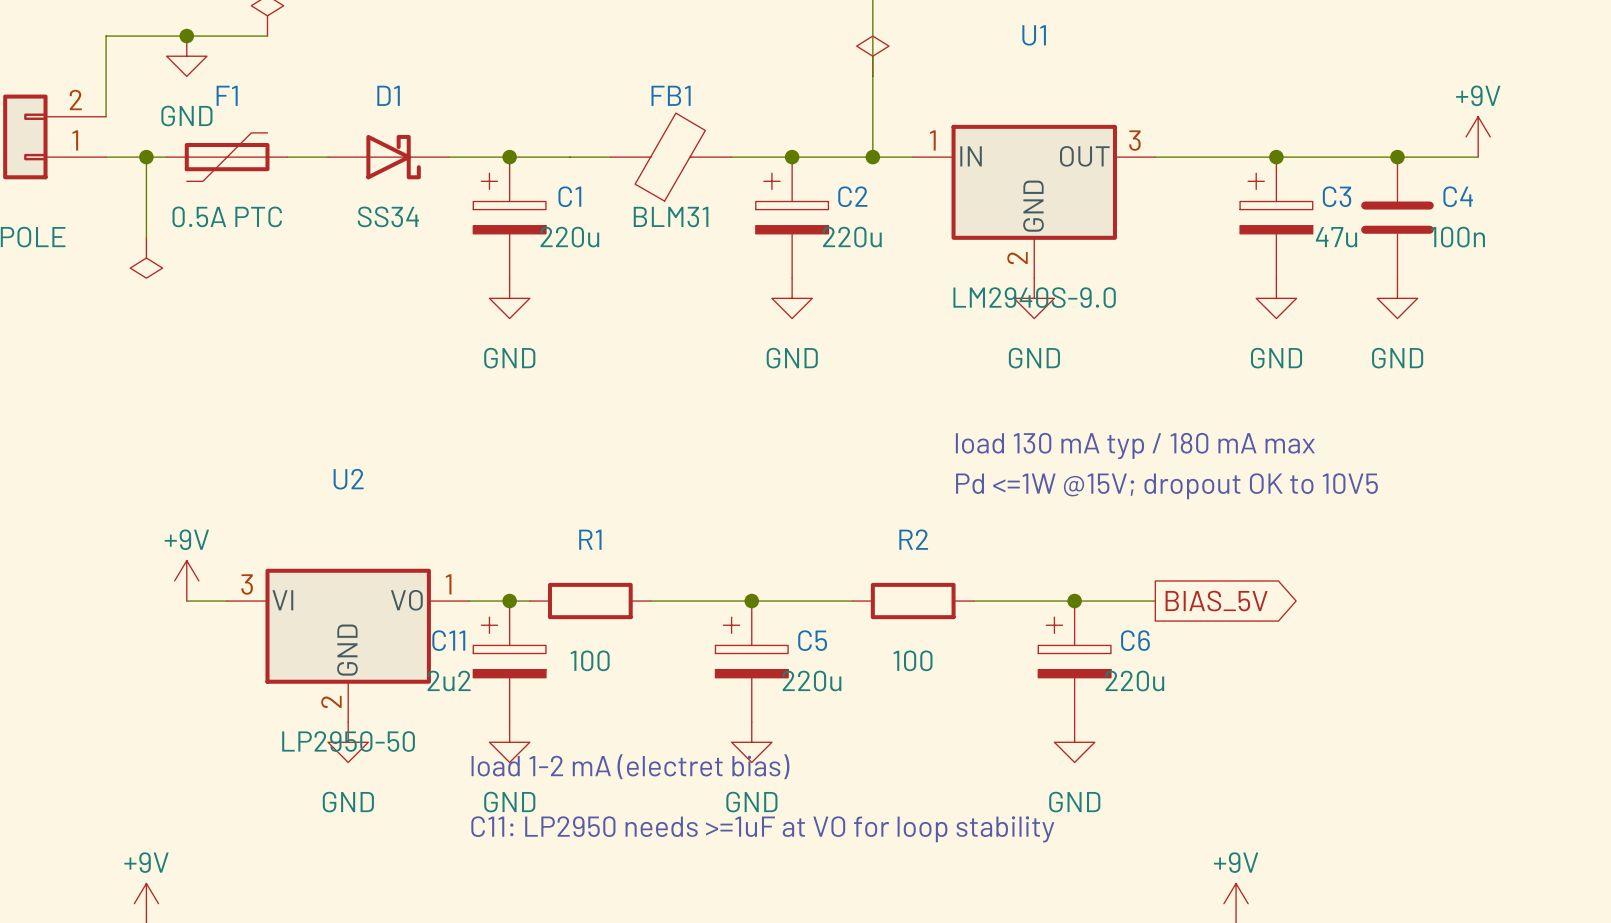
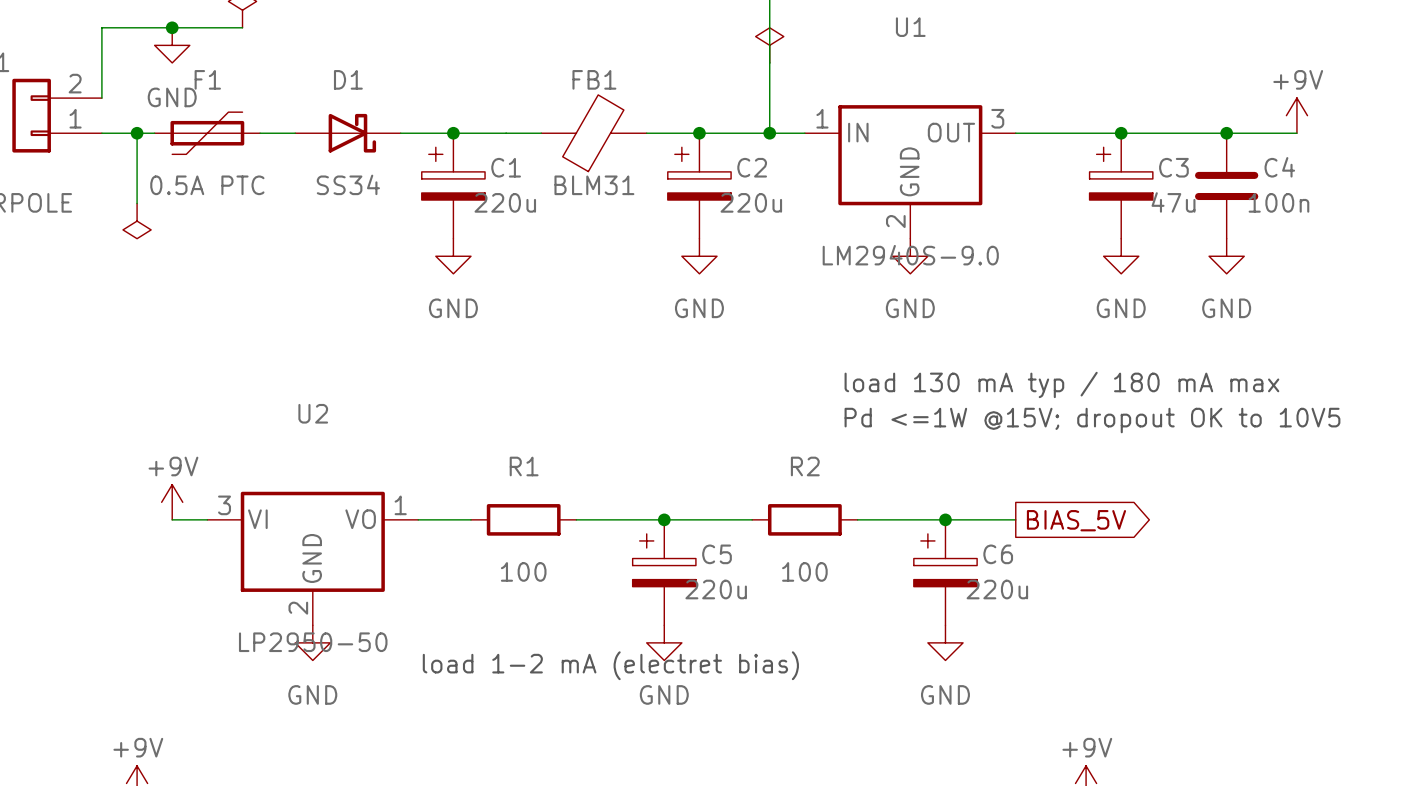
junction: (509, 601) -> none
C11: 2u2 (509, 661) -> none
power symbol: GND (509, 742) -> none
text: C11: LP2950 needs >=1uF at VO for loop stability (762, 829) -> none

